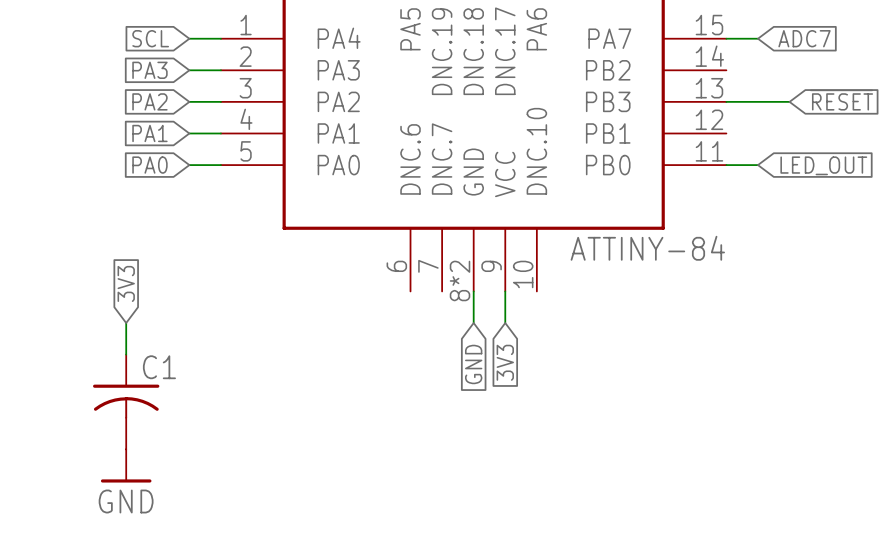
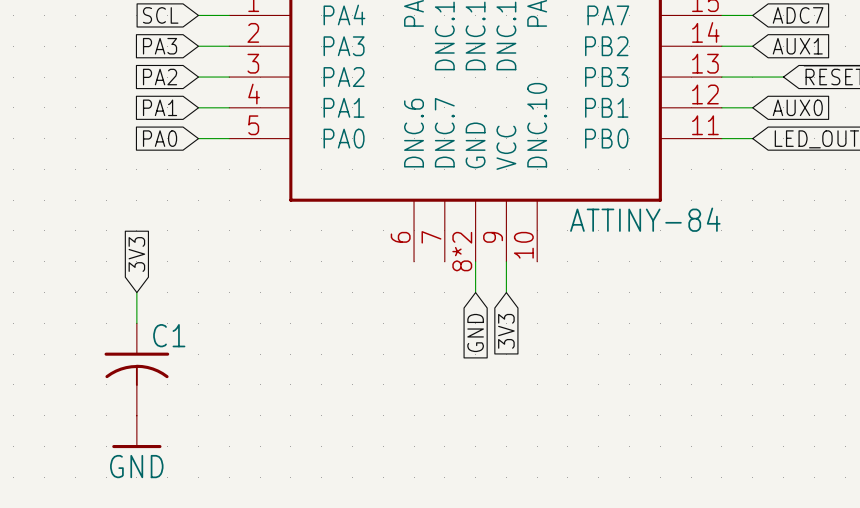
wire: none -> (721, 46) (752, 46)
global label: none -> AUX1 (797, 46)
wire: none -> (721, 107) (752, 107)
global label: none -> AUX0 (797, 107)

